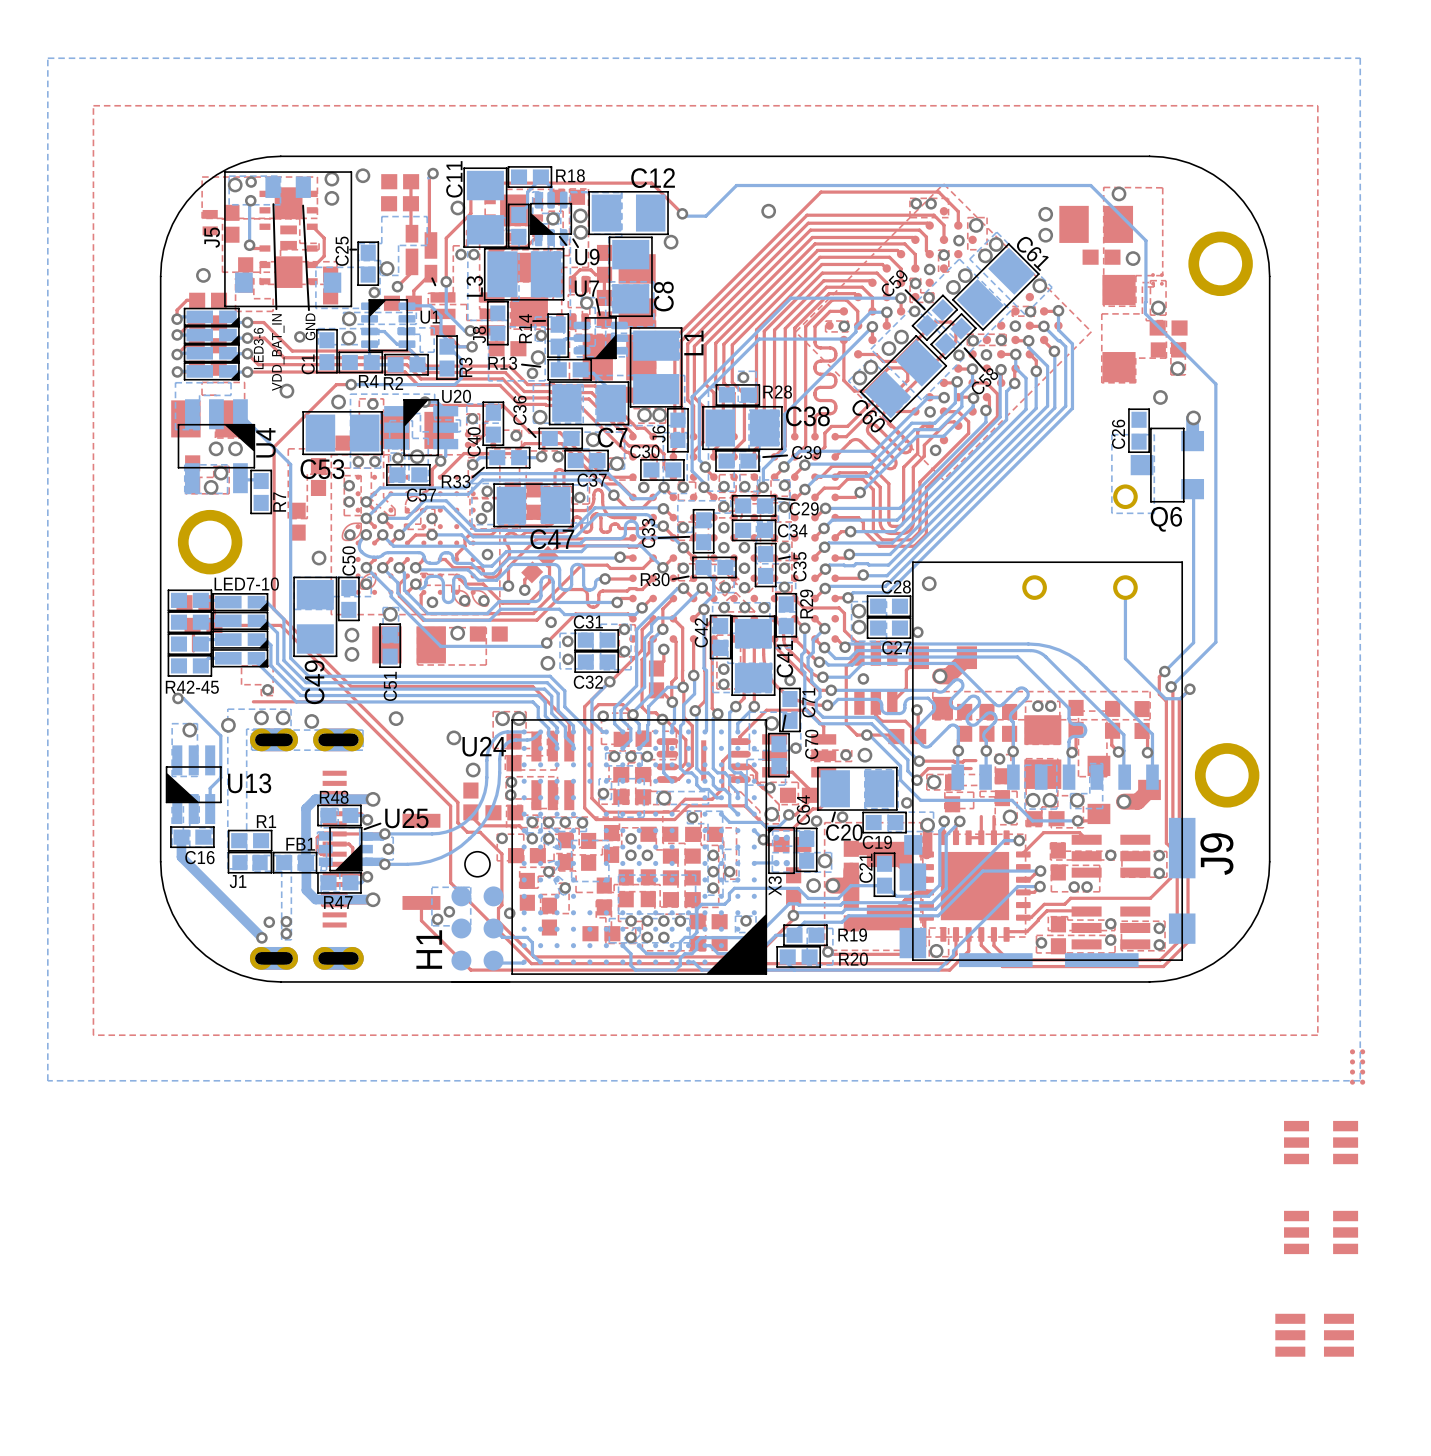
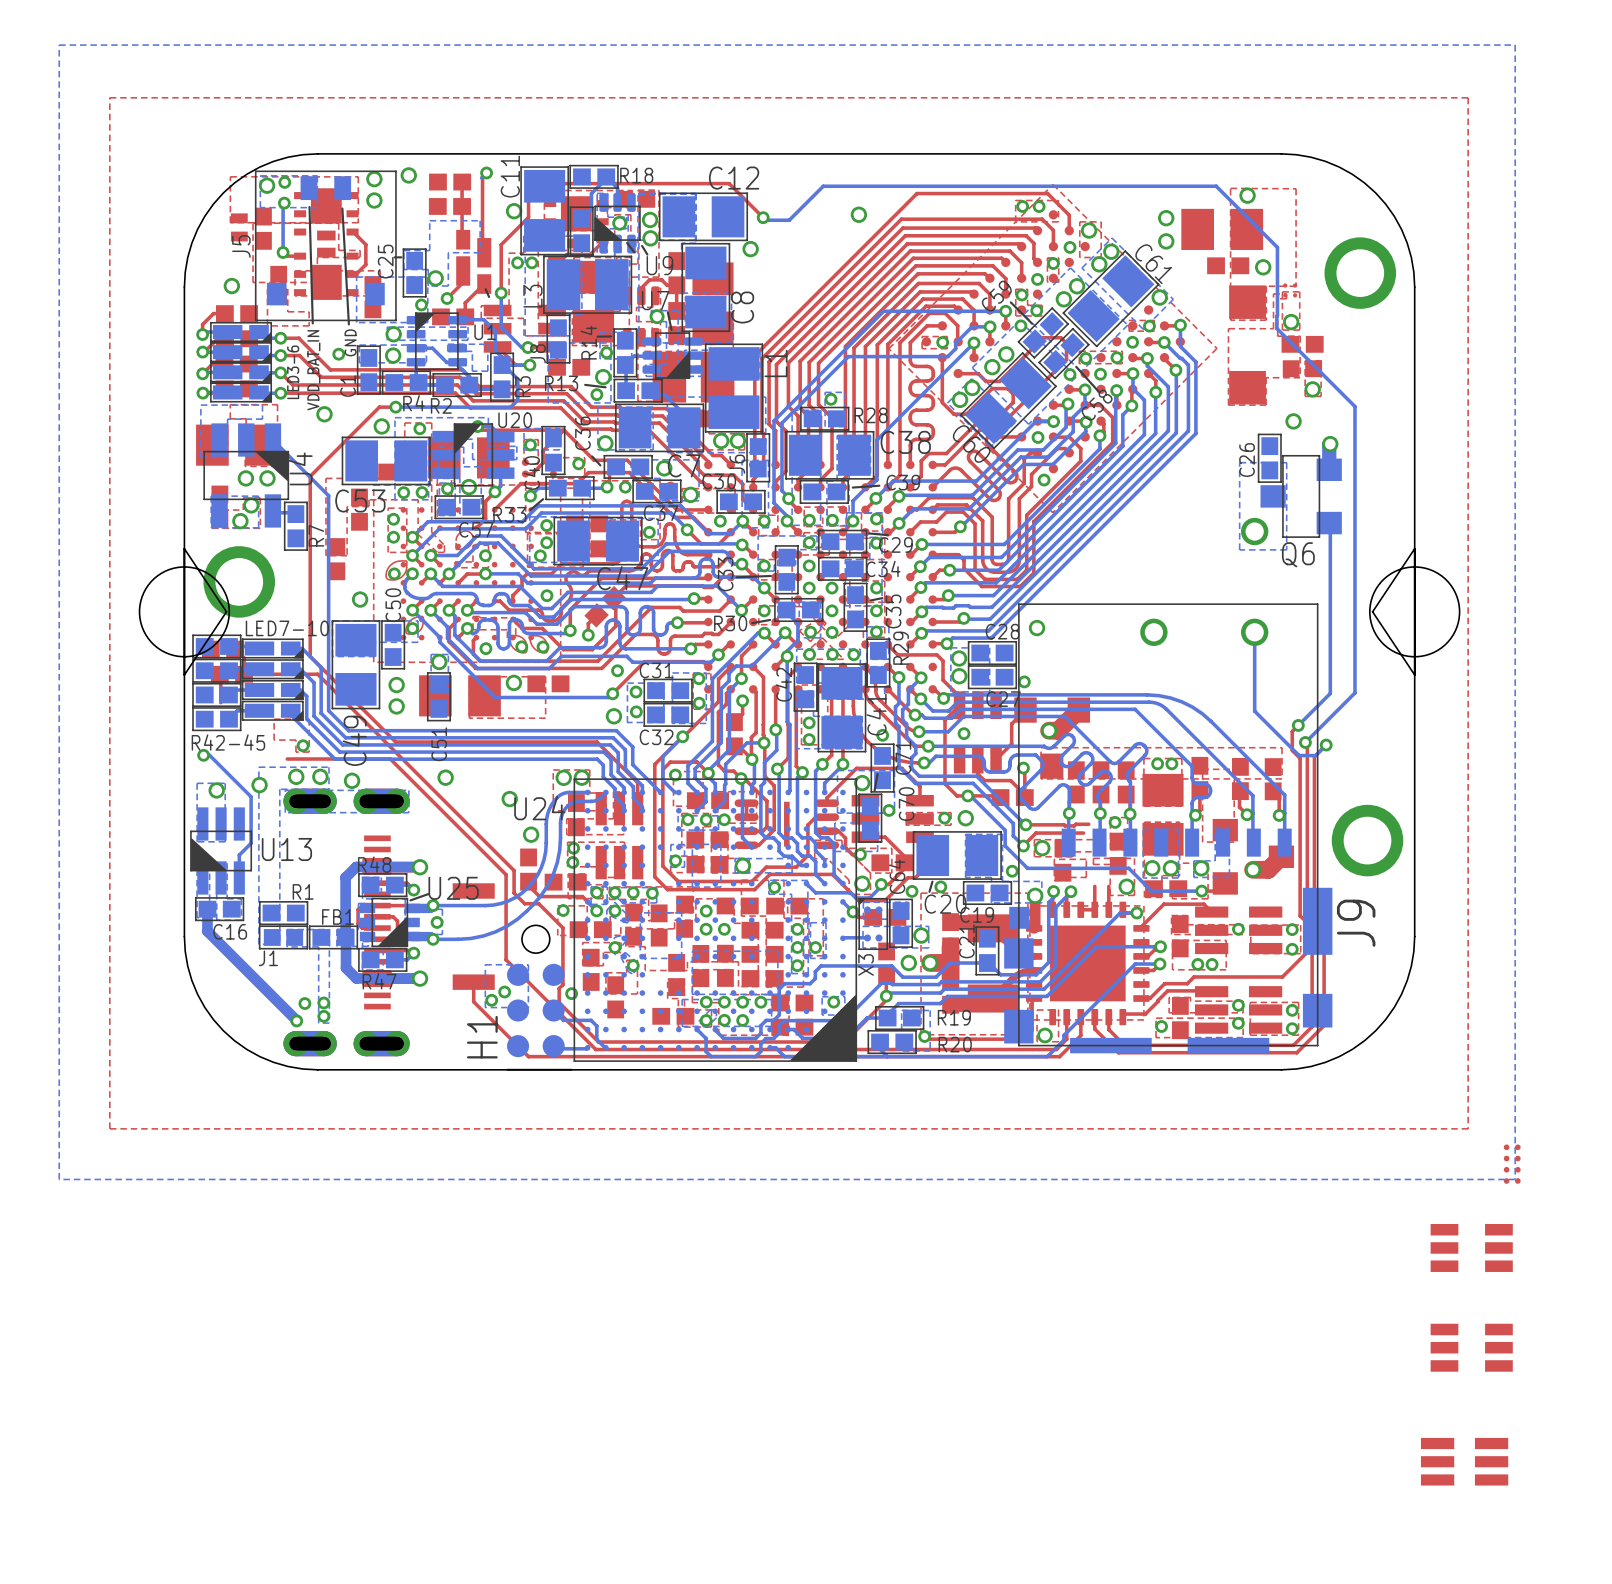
board edge: none -> (184, 548) (226, 611) (184, 674)
board edge: none -> (1414, 548) (1372, 611) (1414, 674)
round board edge: none -> [139, 566, 230, 657]
round board edge: none -> [1369, 566, 1460, 657]

